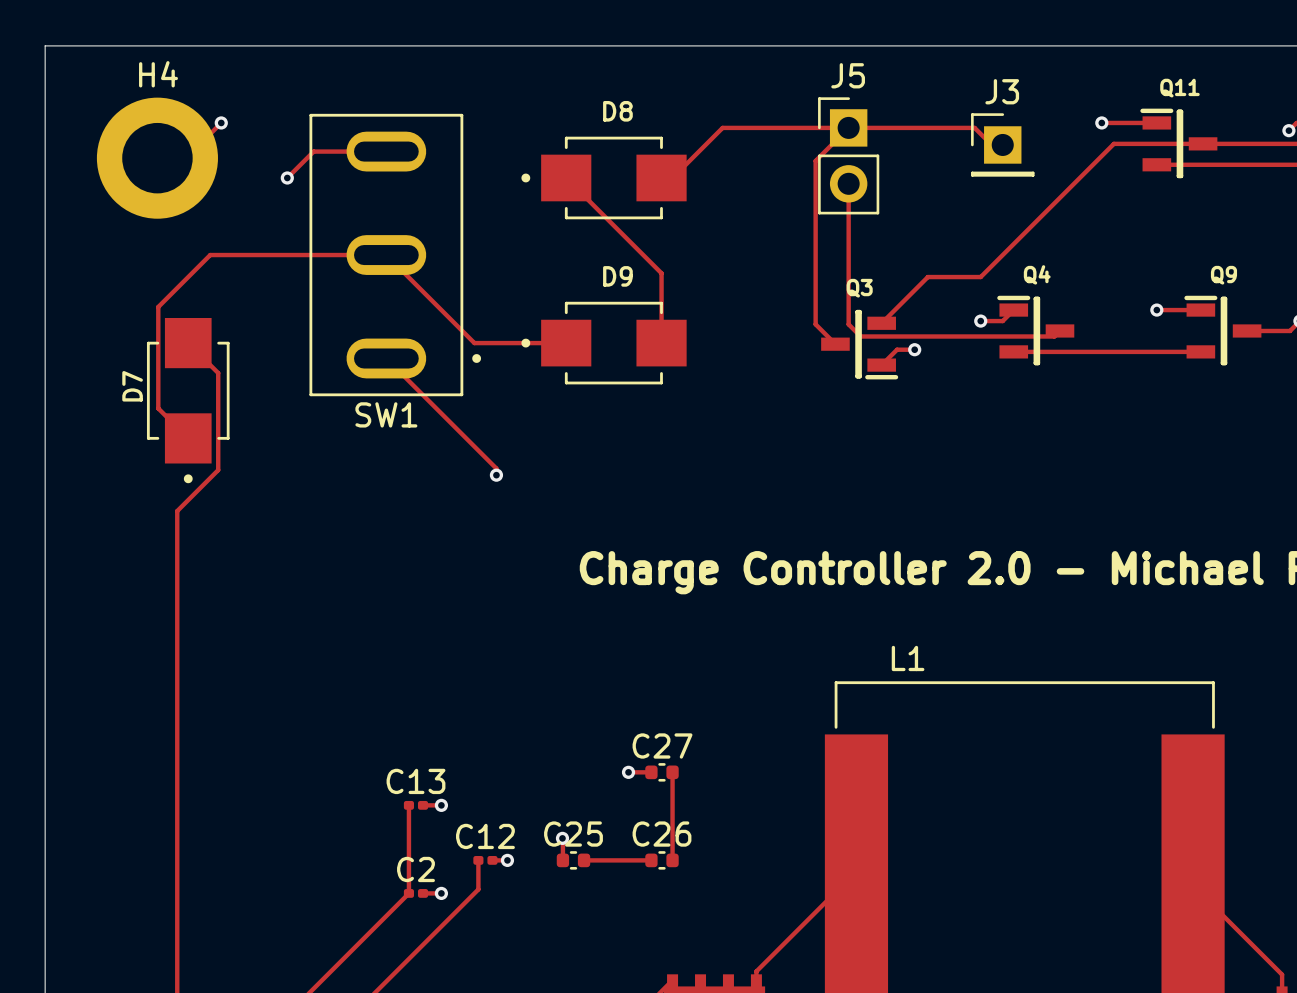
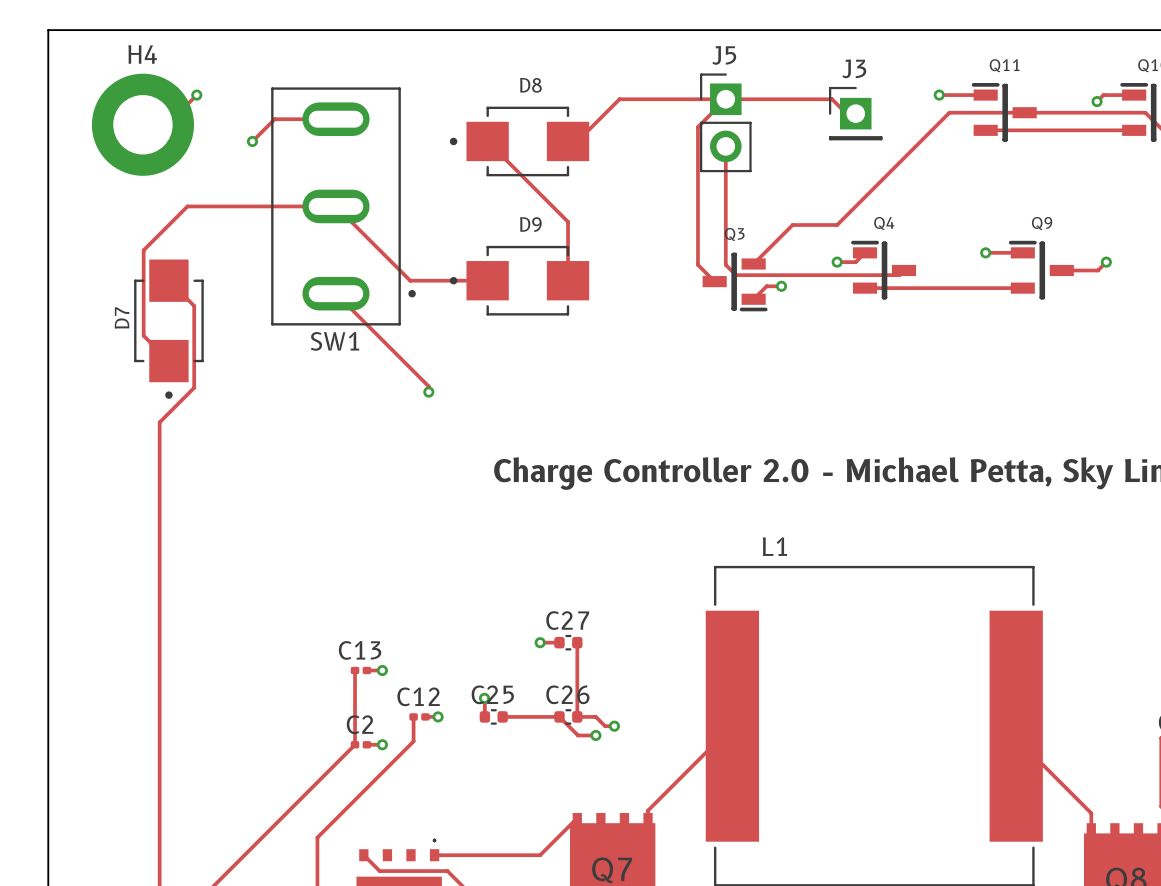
track: none -> (559, 716) (578, 735) (595, 735)
track: none -> (577, 716) (595, 716) (605, 726) (614, 726)
via: none -> (614, 726)
via: none -> (595, 735)

